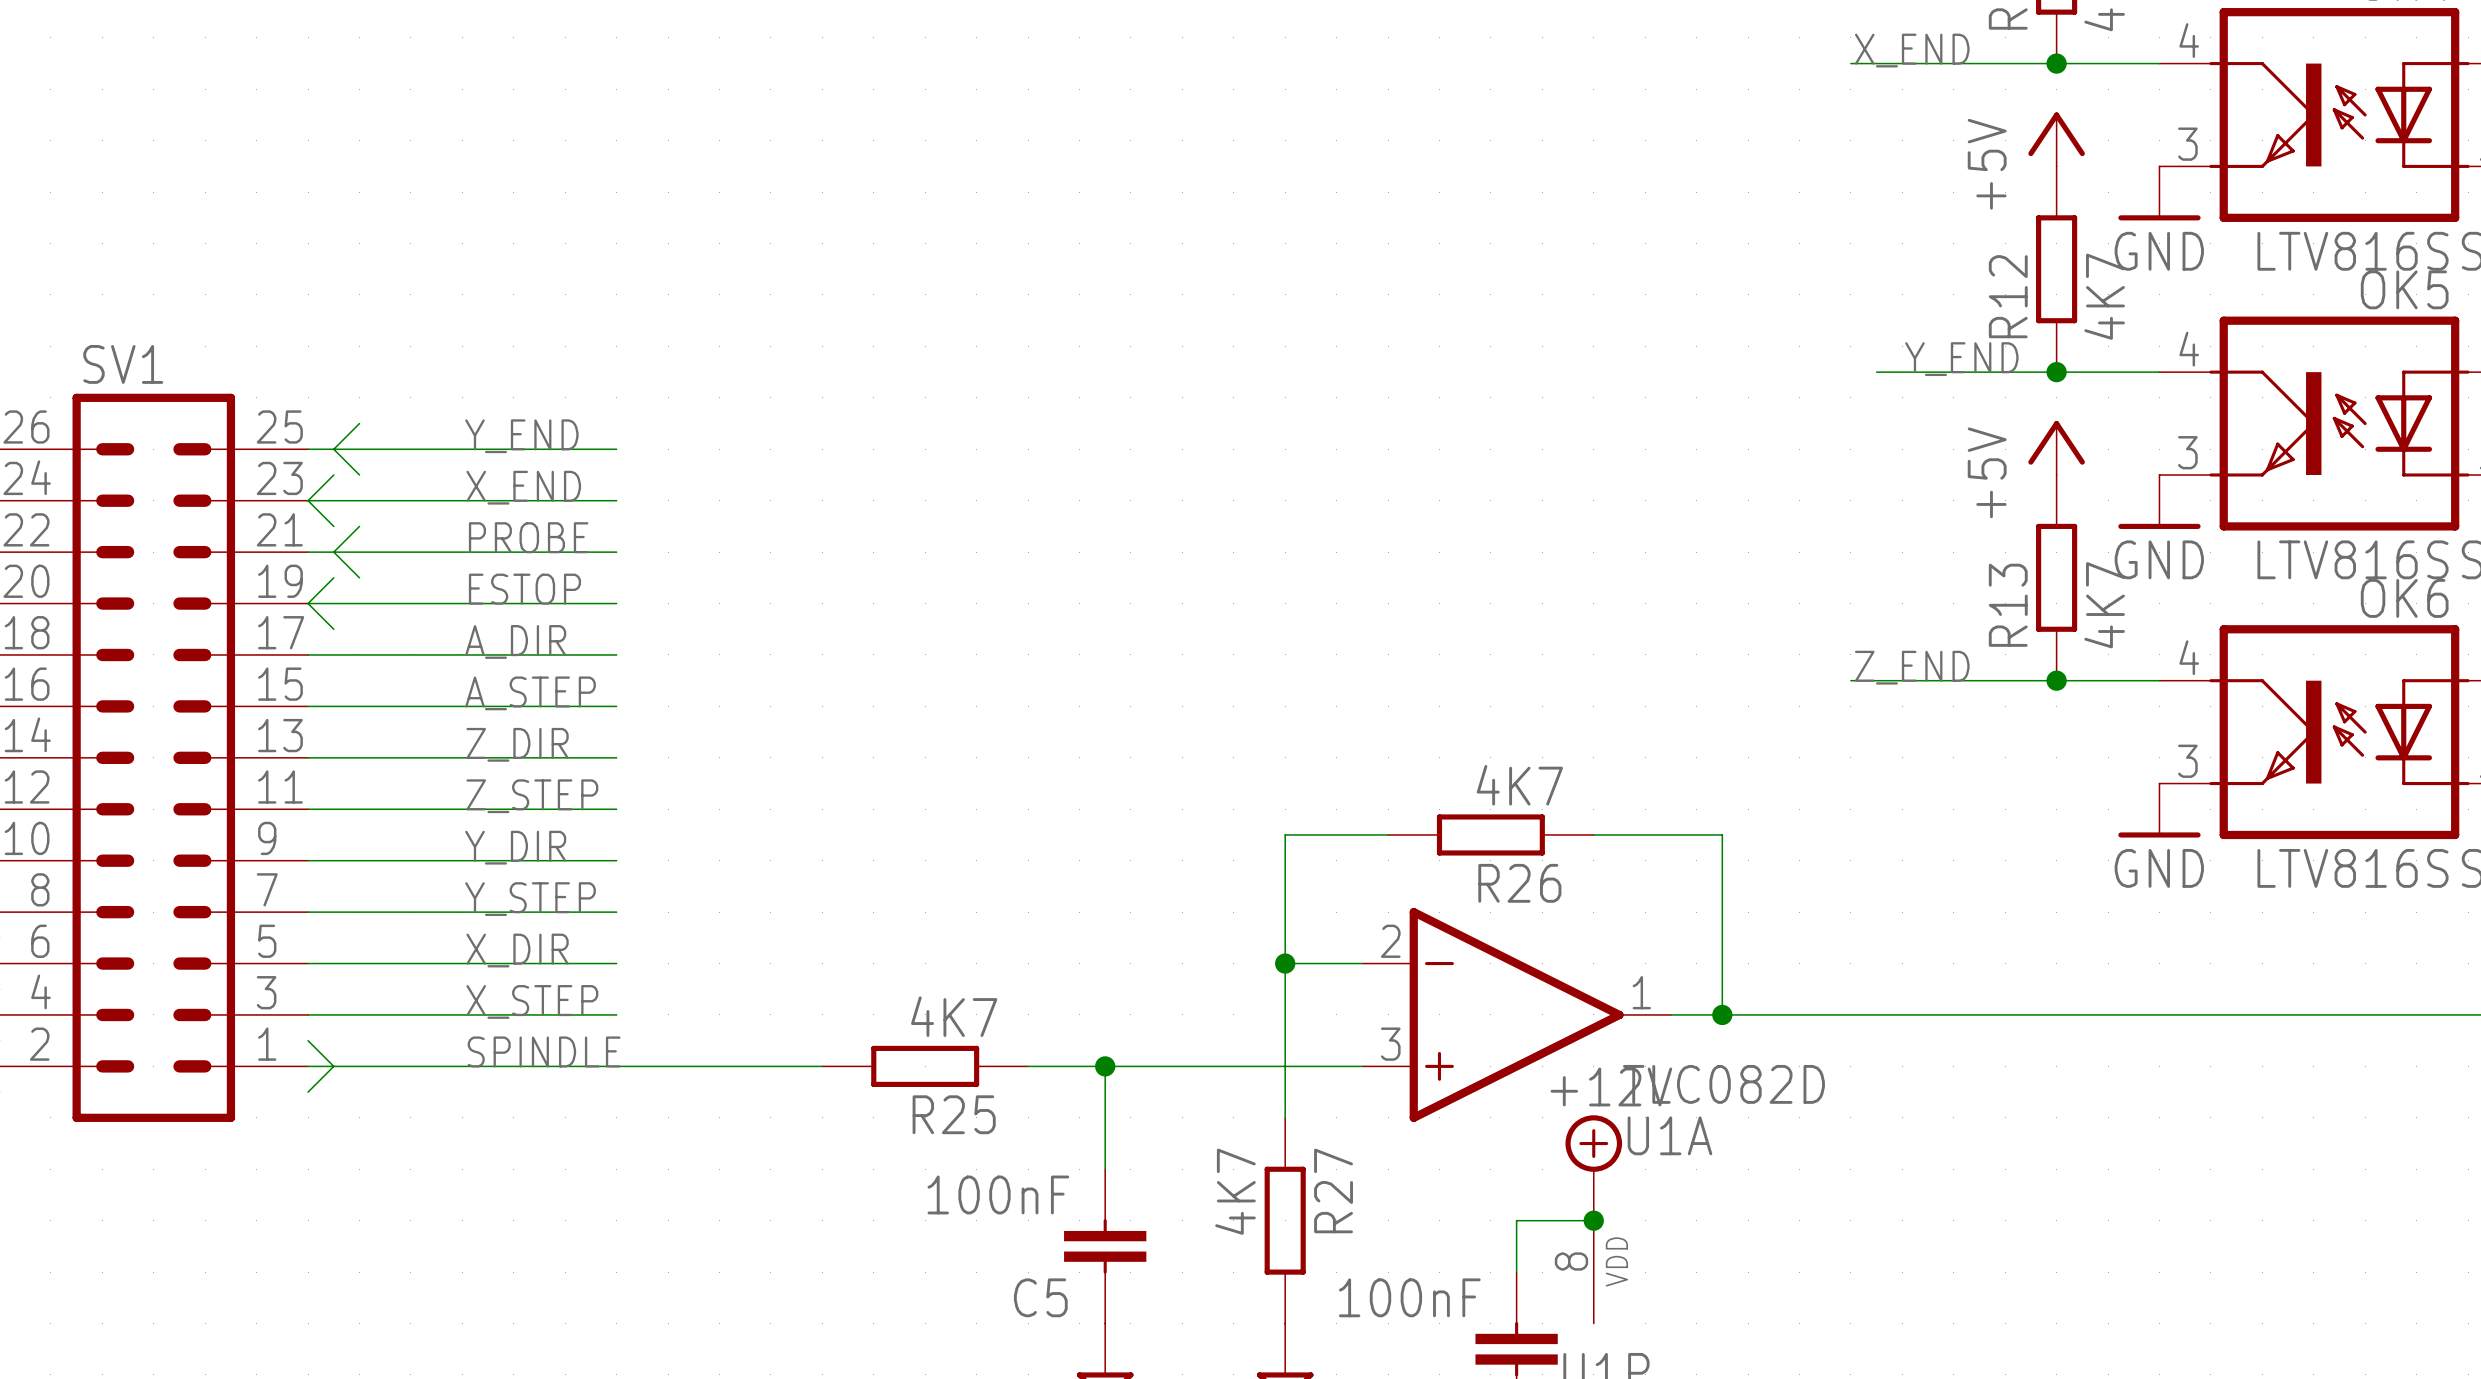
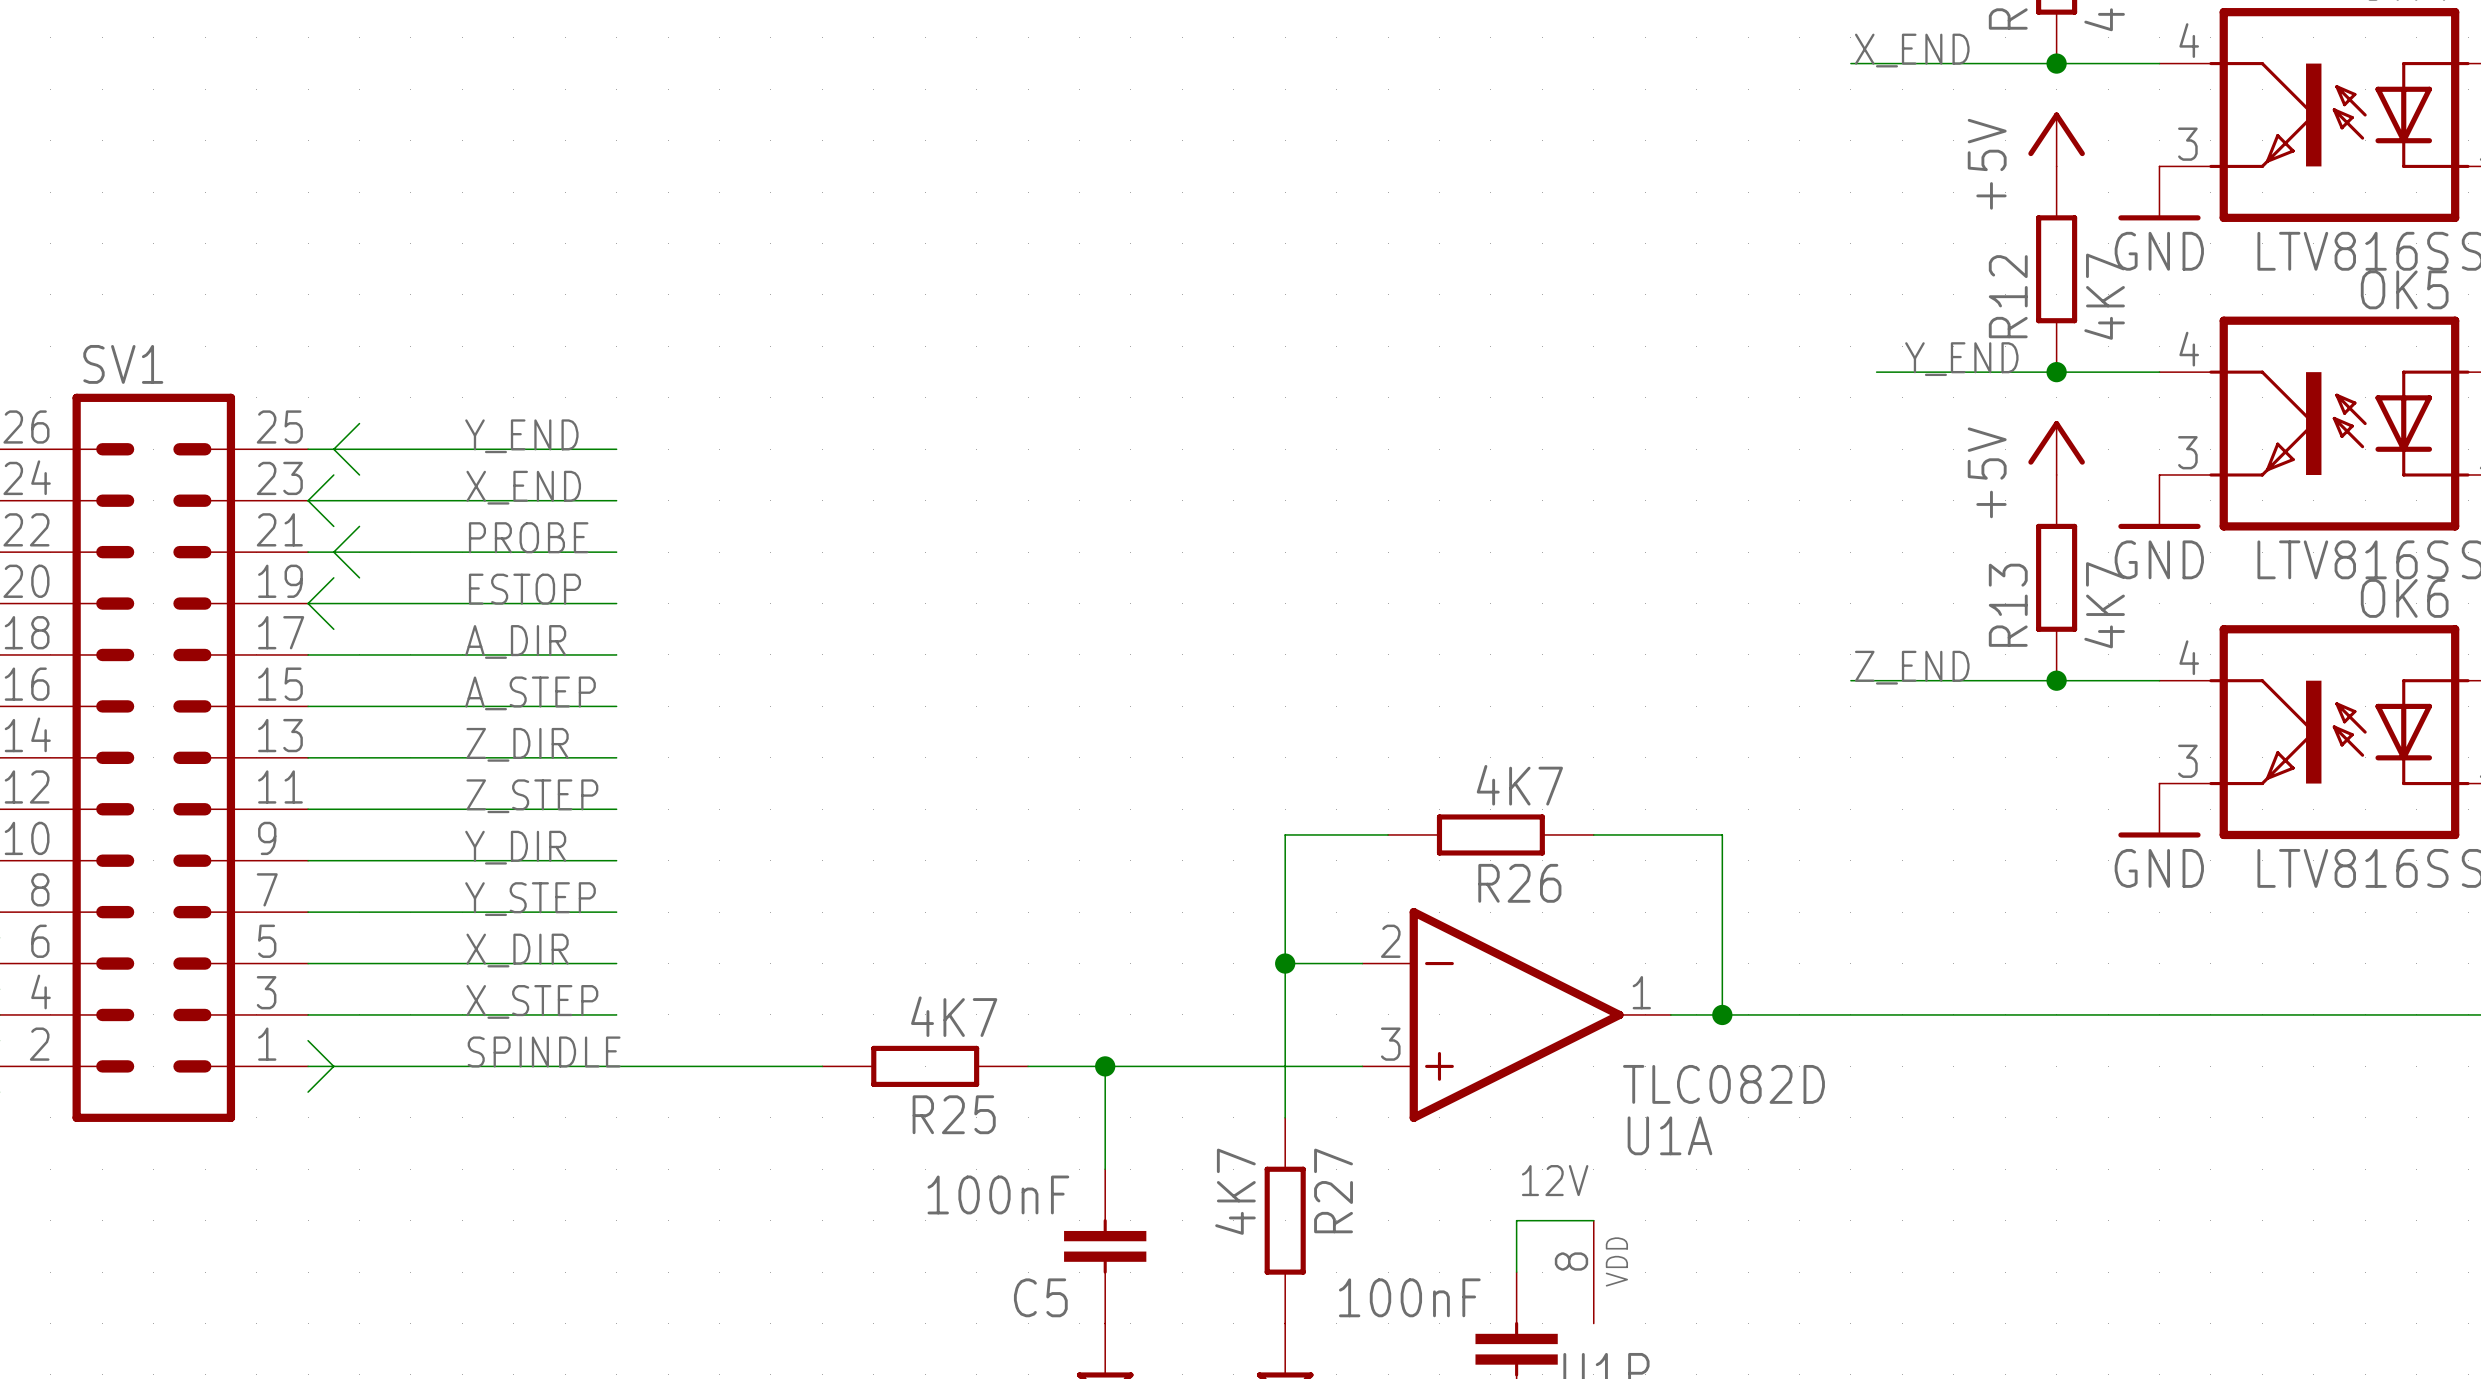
power symbol: +12V (1593, 1167) -> none
label: none -> 12V (1555, 1180)
junction: (1593, 1220) -> none

